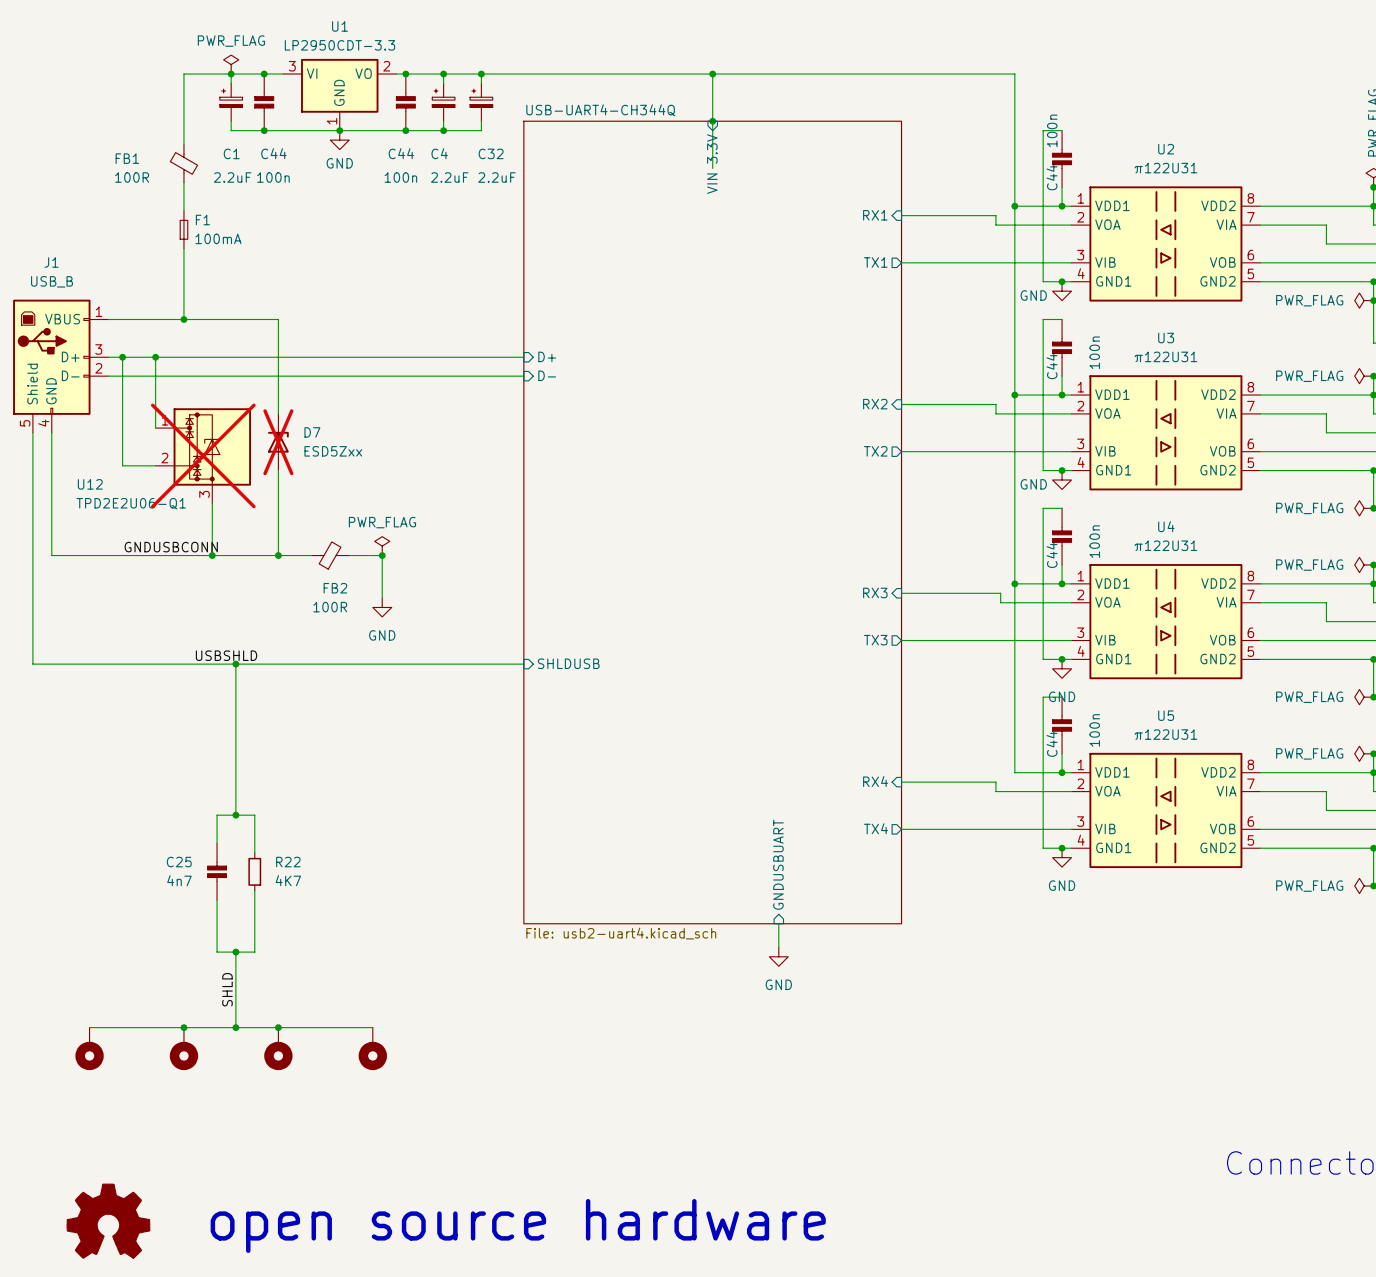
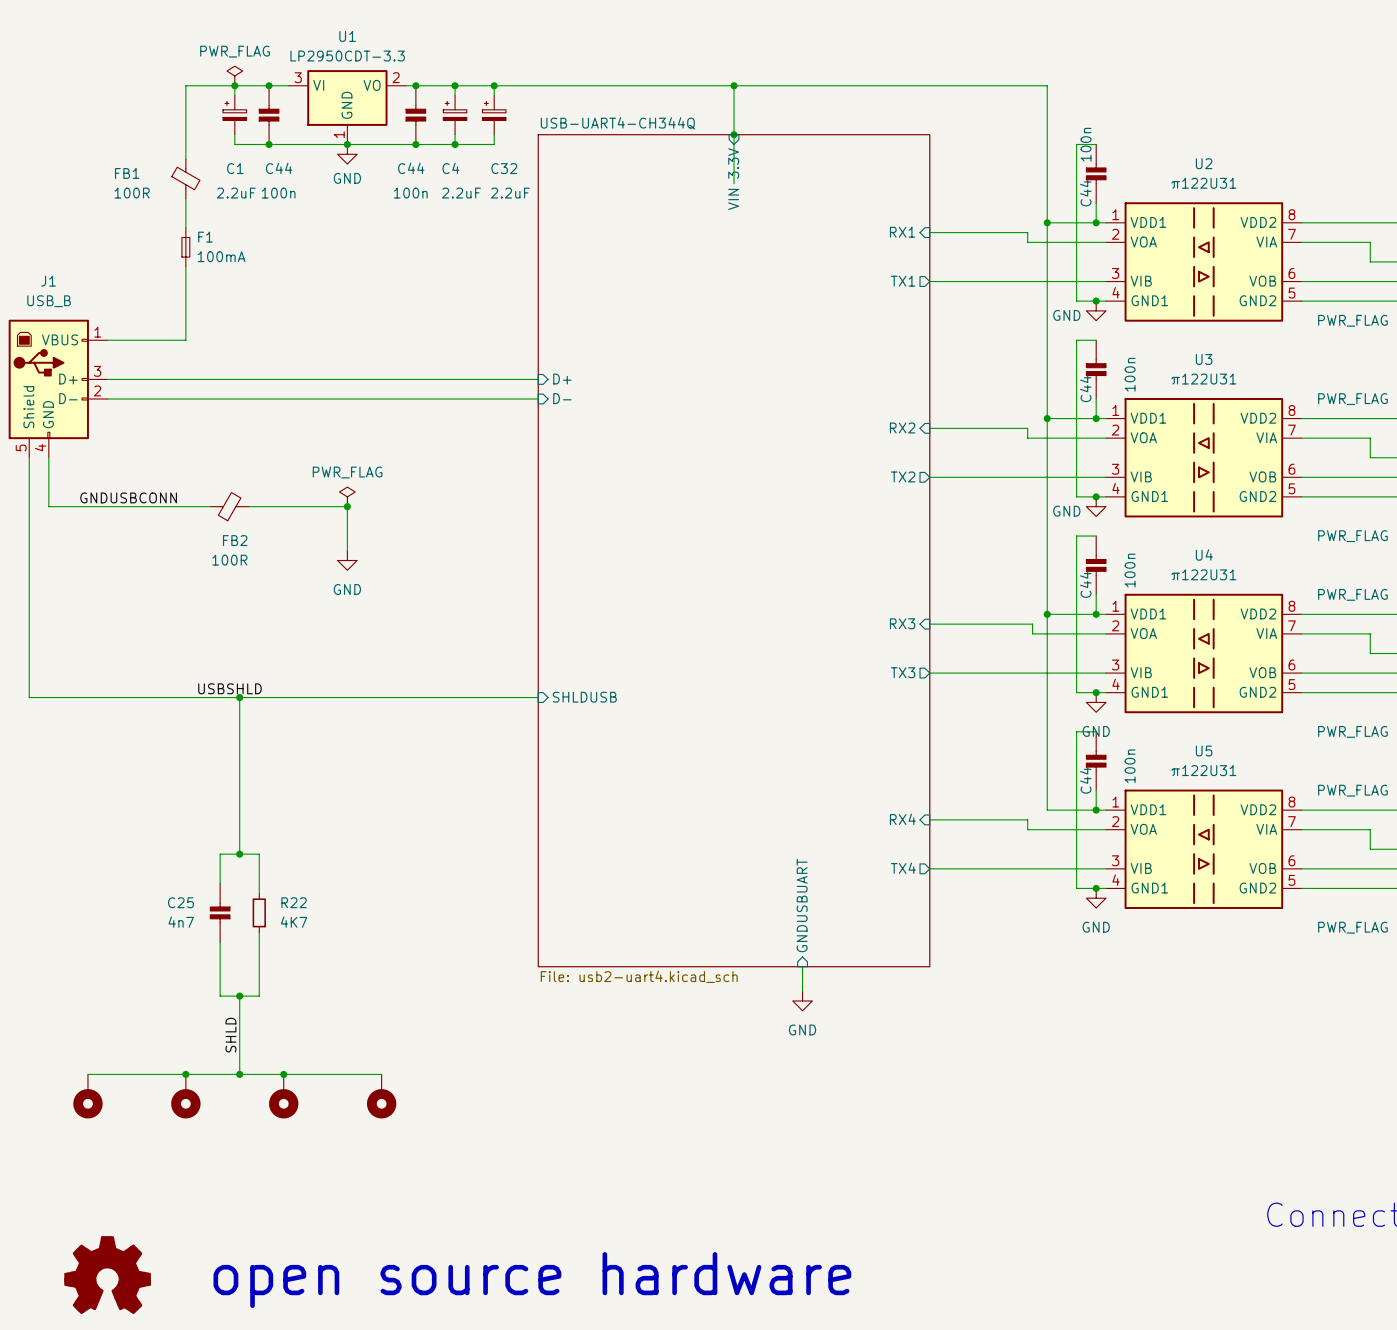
wire: (183, 319) (278, 319) (278, 413) -> none
junction: (183, 319) -> none
wire: (122, 357) (122, 465) (155, 465) -> none
junction: (122, 357) -> none
wire: (155, 357) (155, 428) -> none
junction: (155, 357) -> none
D7: ESD5Zxx (278, 442) -> none
U12: TPD2E2U06-Q1 (203, 455) -> none
wire: (278, 470) (278, 555) -> none
wire: (51, 480) (51, 555) (311, 555) -> (48, 506) (210, 506)
wire: none -> (249, 506) (347, 506) (347, 550)
junction: none -> (347, 506)
wire: (212, 503) (212, 555) -> none
power symbol position: PWR_FLAG (382, 546) -> PWR_FLAG (347, 496)
label position: GNDUSBCONN (171, 547) -> GNDUSBCONN (128, 497)
junction: (212, 555) -> none
junction: (278, 555) -> none
FB2 position: (330, 555) -> (229, 506)
wire: (349, 555) (382, 555) (382, 598) -> none
junction: (382, 555) -> none
power symbol position: GND (382, 607) -> GND (347, 560)

